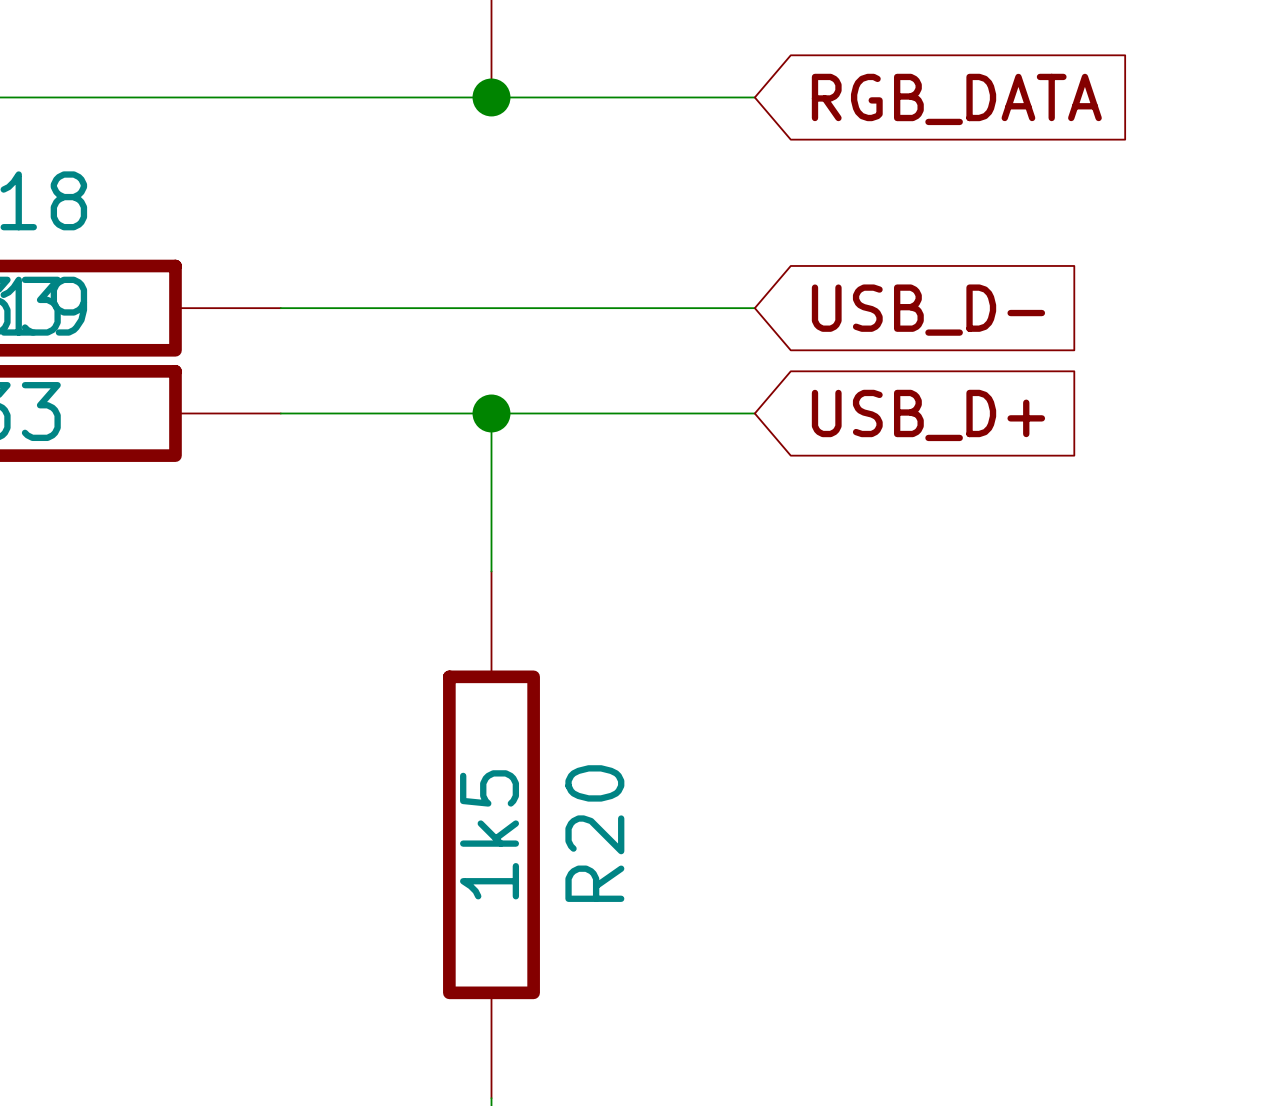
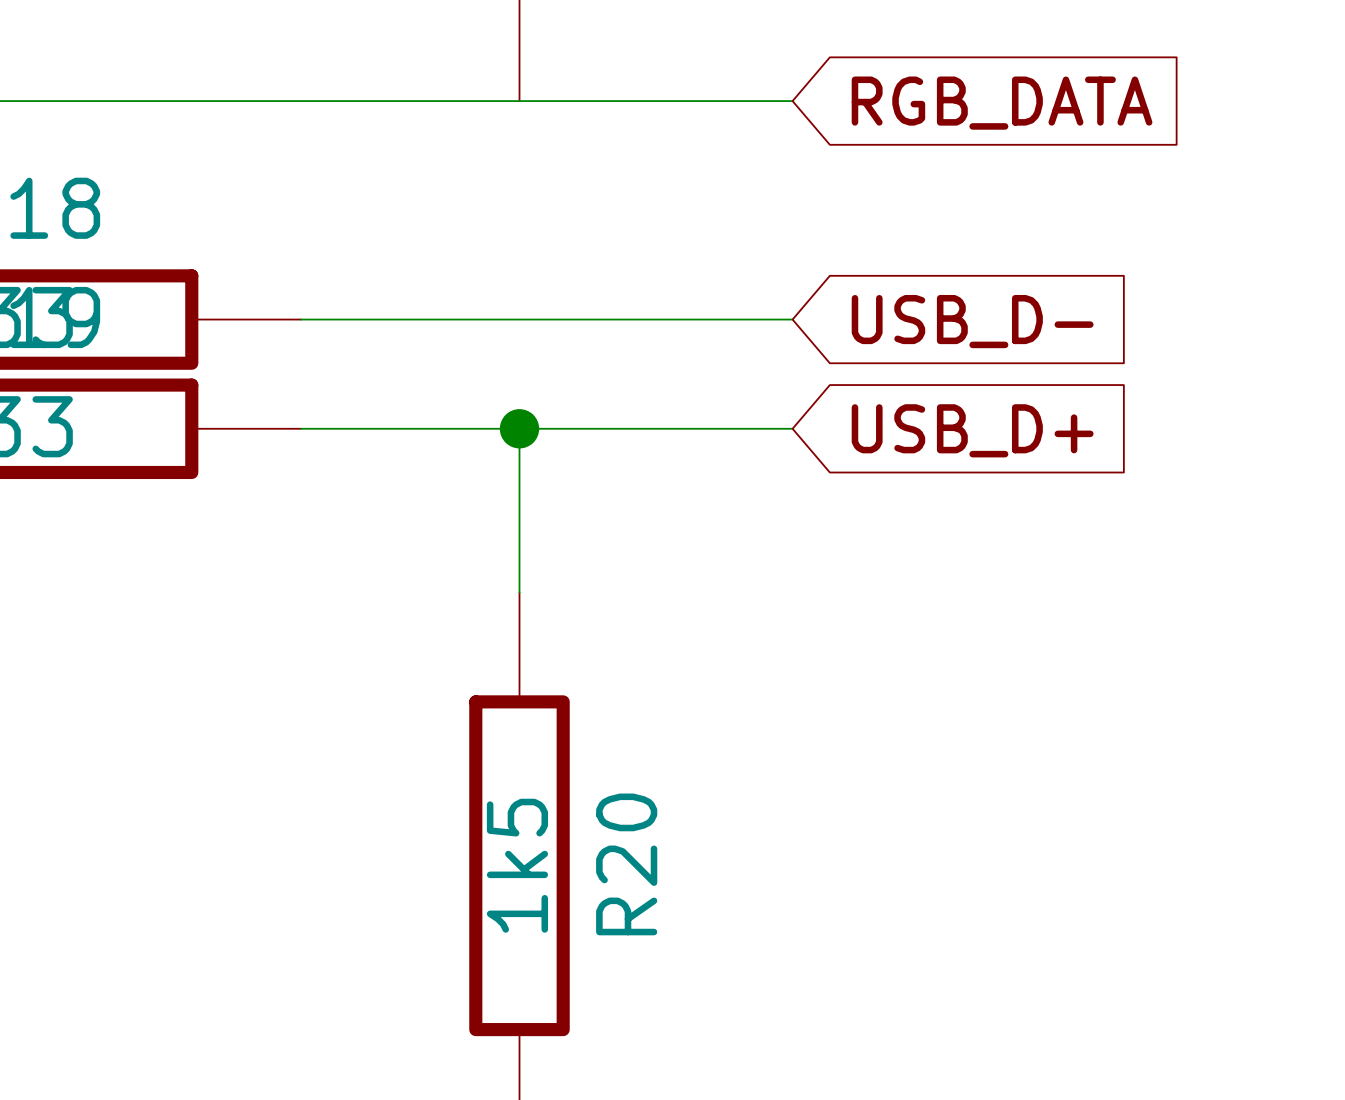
junction: (491, 97) -> none

